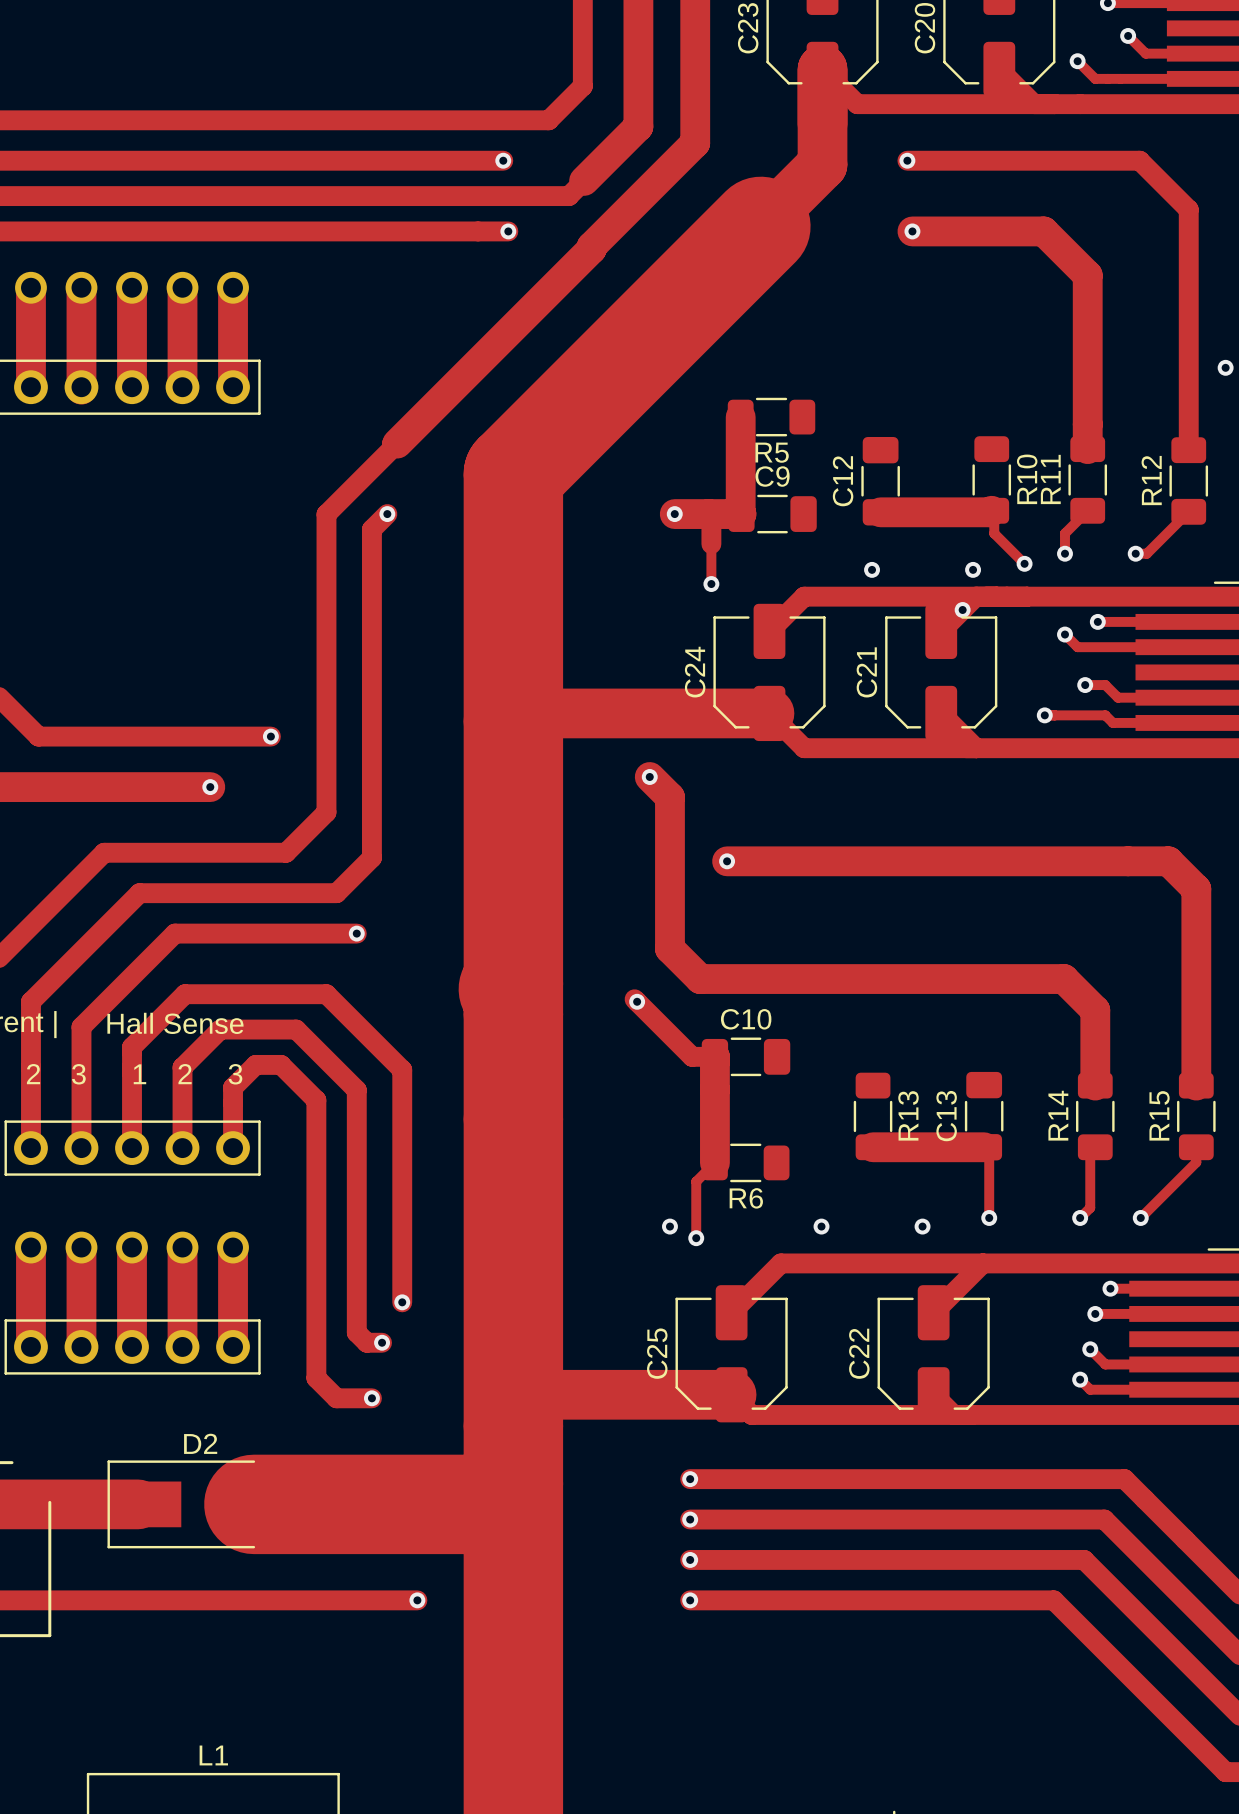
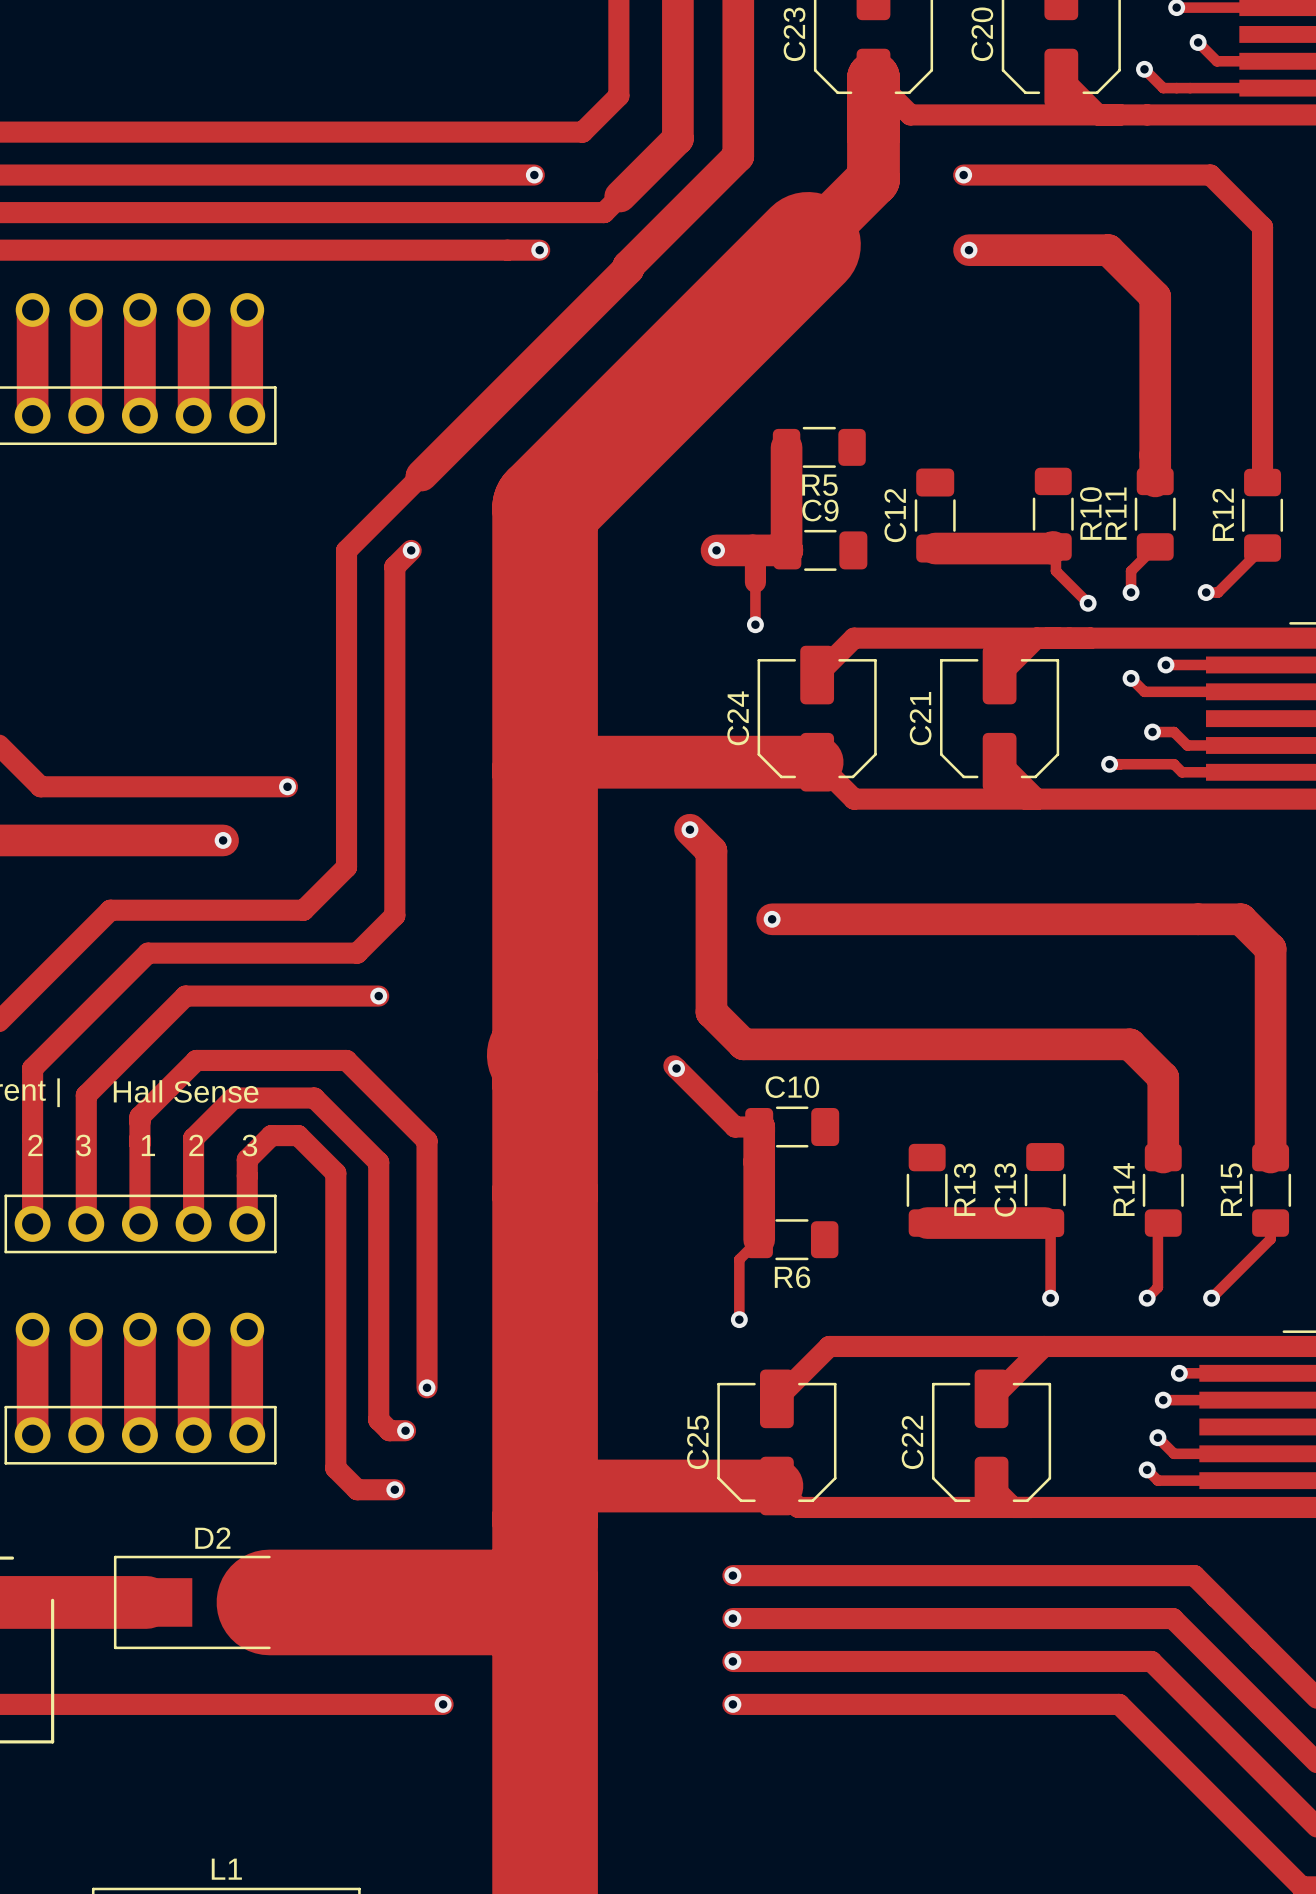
via: (1225, 367) -> none
via: (872, 569) -> none
via: (973, 569) -> none
via: (962, 609) -> none
via: (669, 1226) -> none
via: (821, 1226) -> none
via: (922, 1226) -> none

